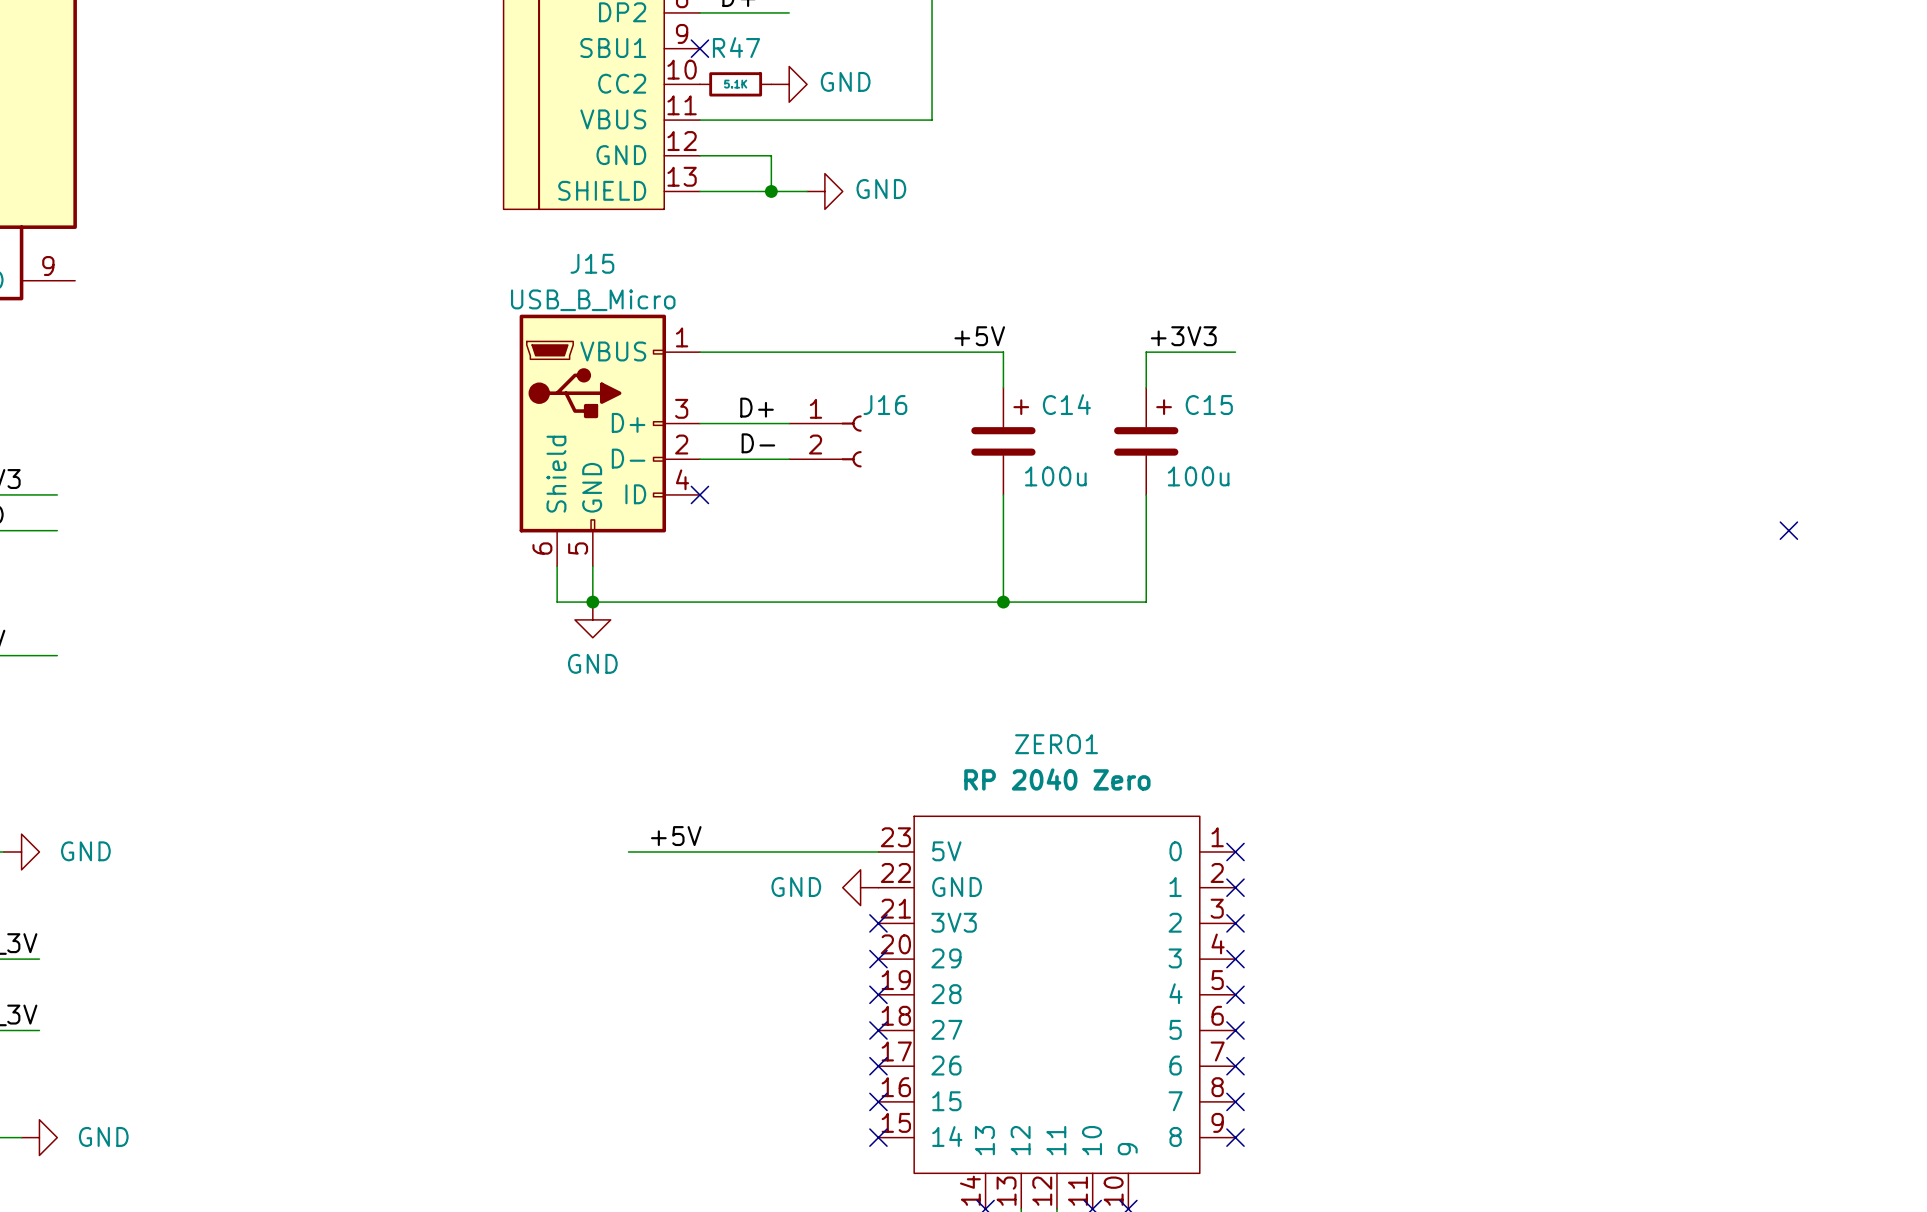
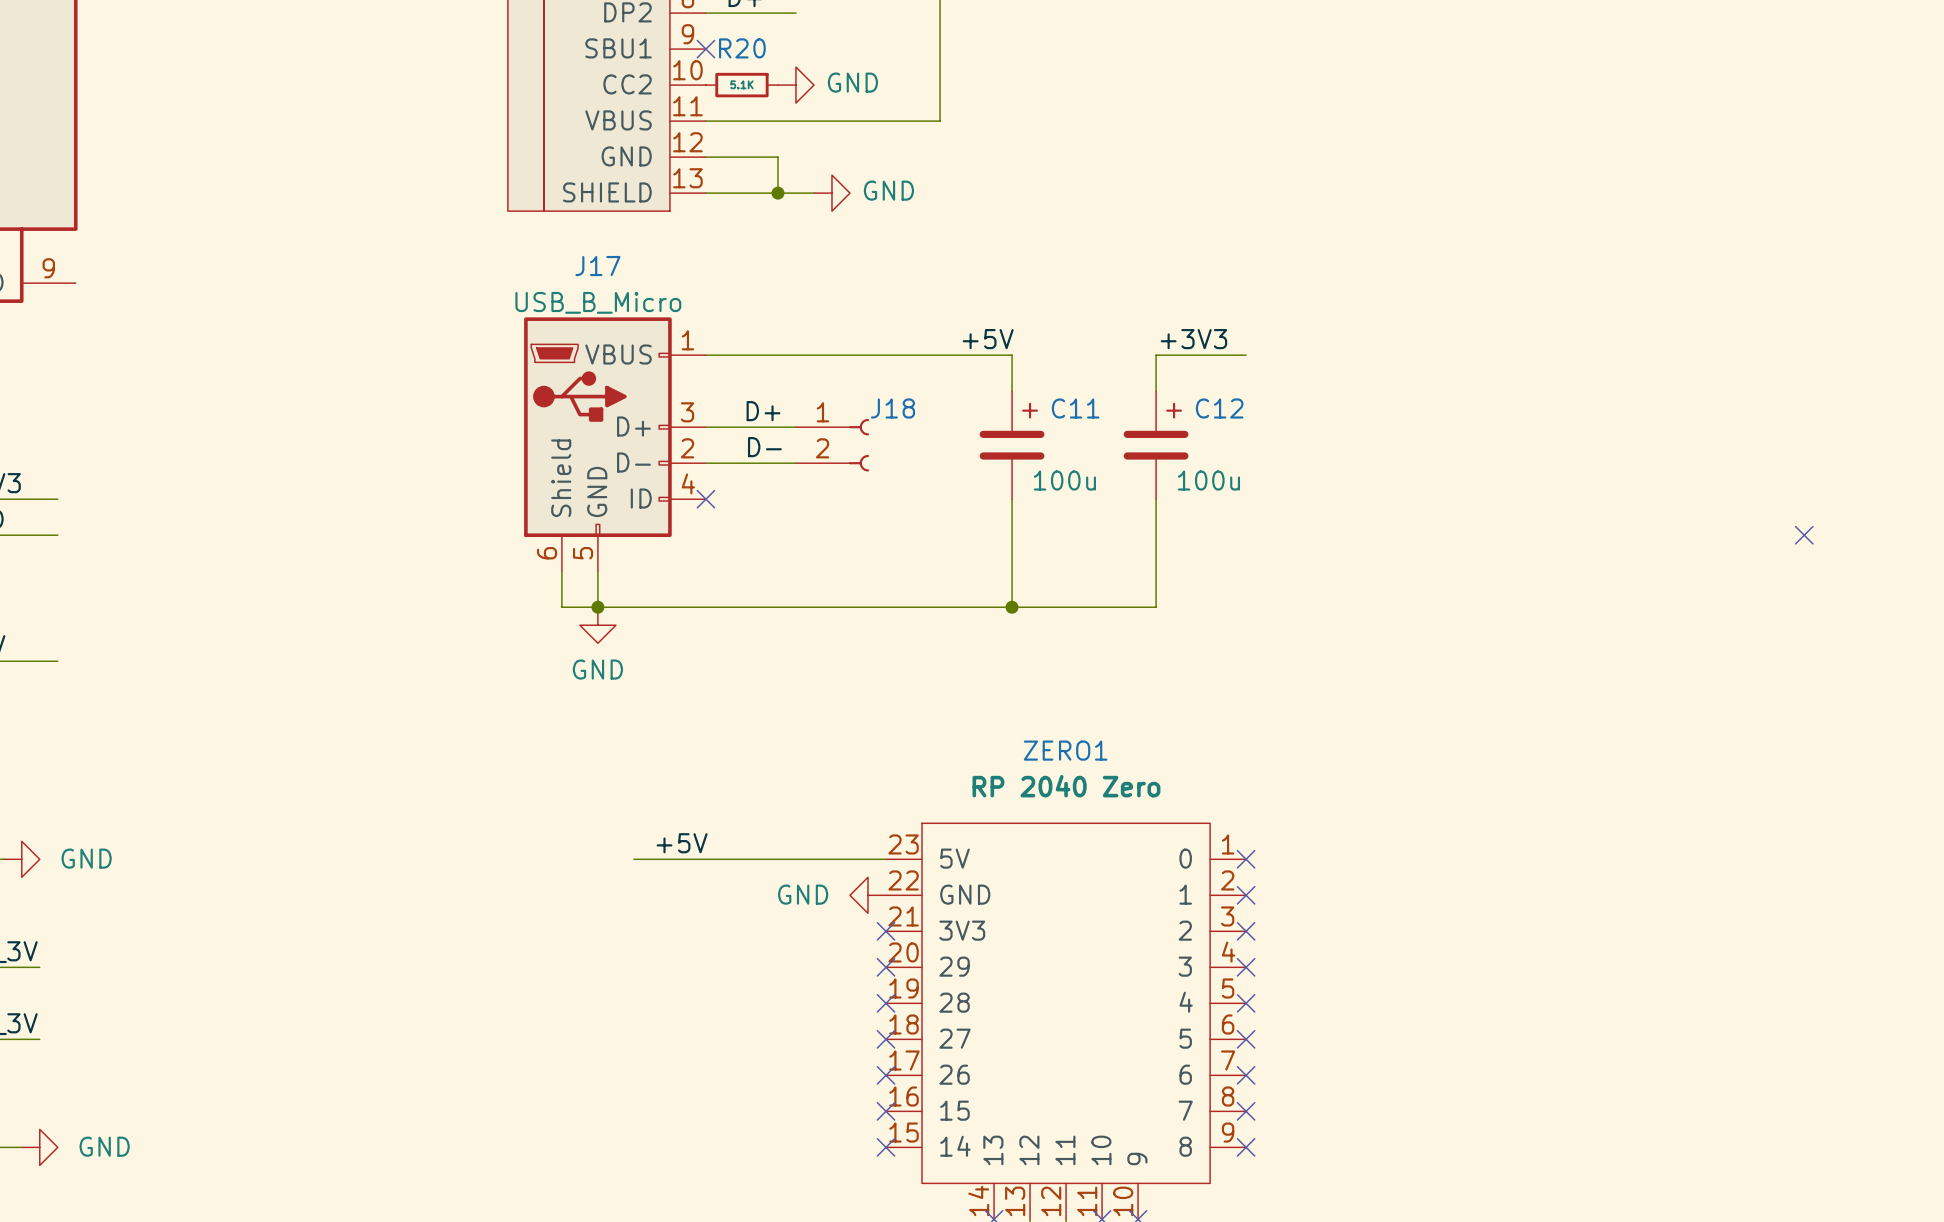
R47 name: R47 (736, 47) -> R20 (742, 48)
J15 name: J15 (592, 263) -> J17 (597, 266)
C14 name: C14 (1066, 404) -> C11 (1075, 408)
J16 name: J16 (885, 405) -> J18 (892, 408)
C15 name: C15 (1209, 405) -> C12 (1219, 408)

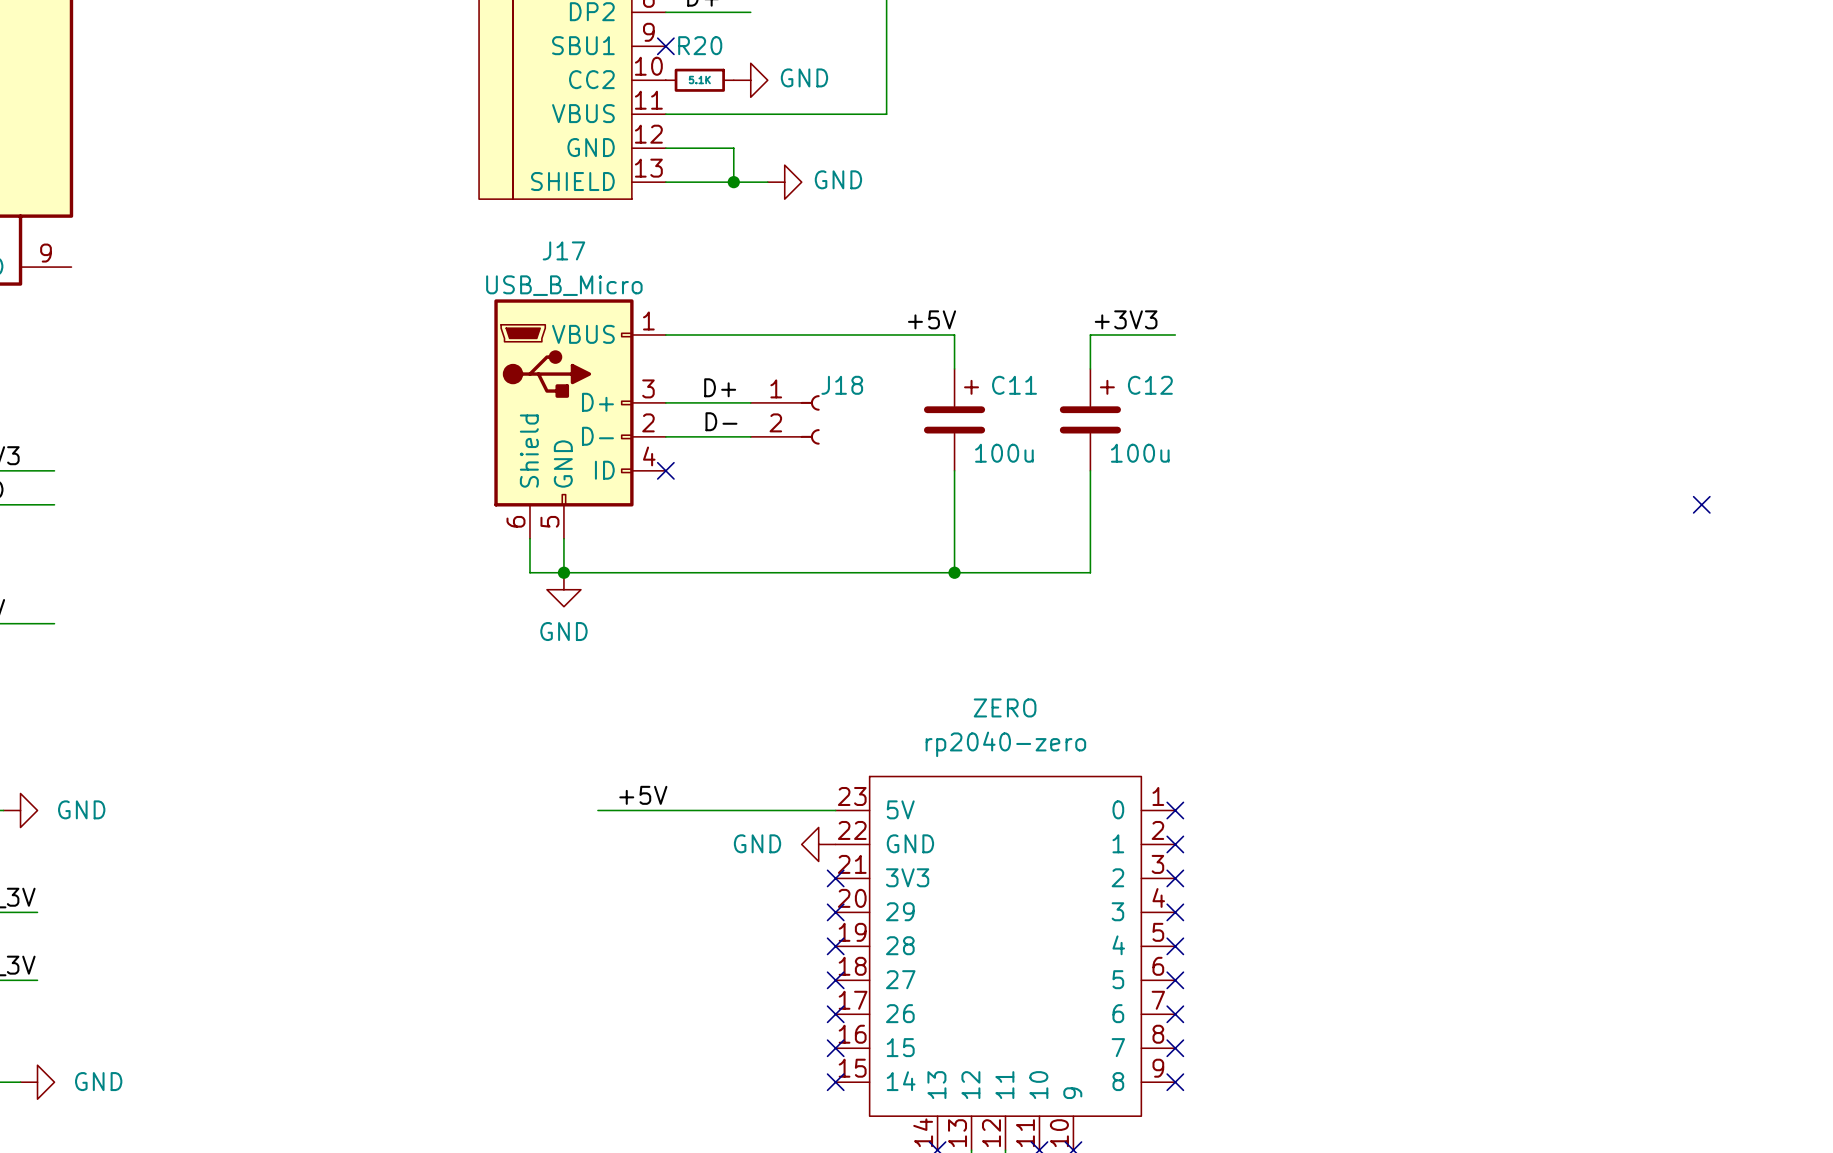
ZERO1 name: ZERO1 (1065, 750) -> ZERO (1005, 707)
ZERO1 value: RP 2040 Zero (1066, 786) -> rp2040-zero (1005, 744)

